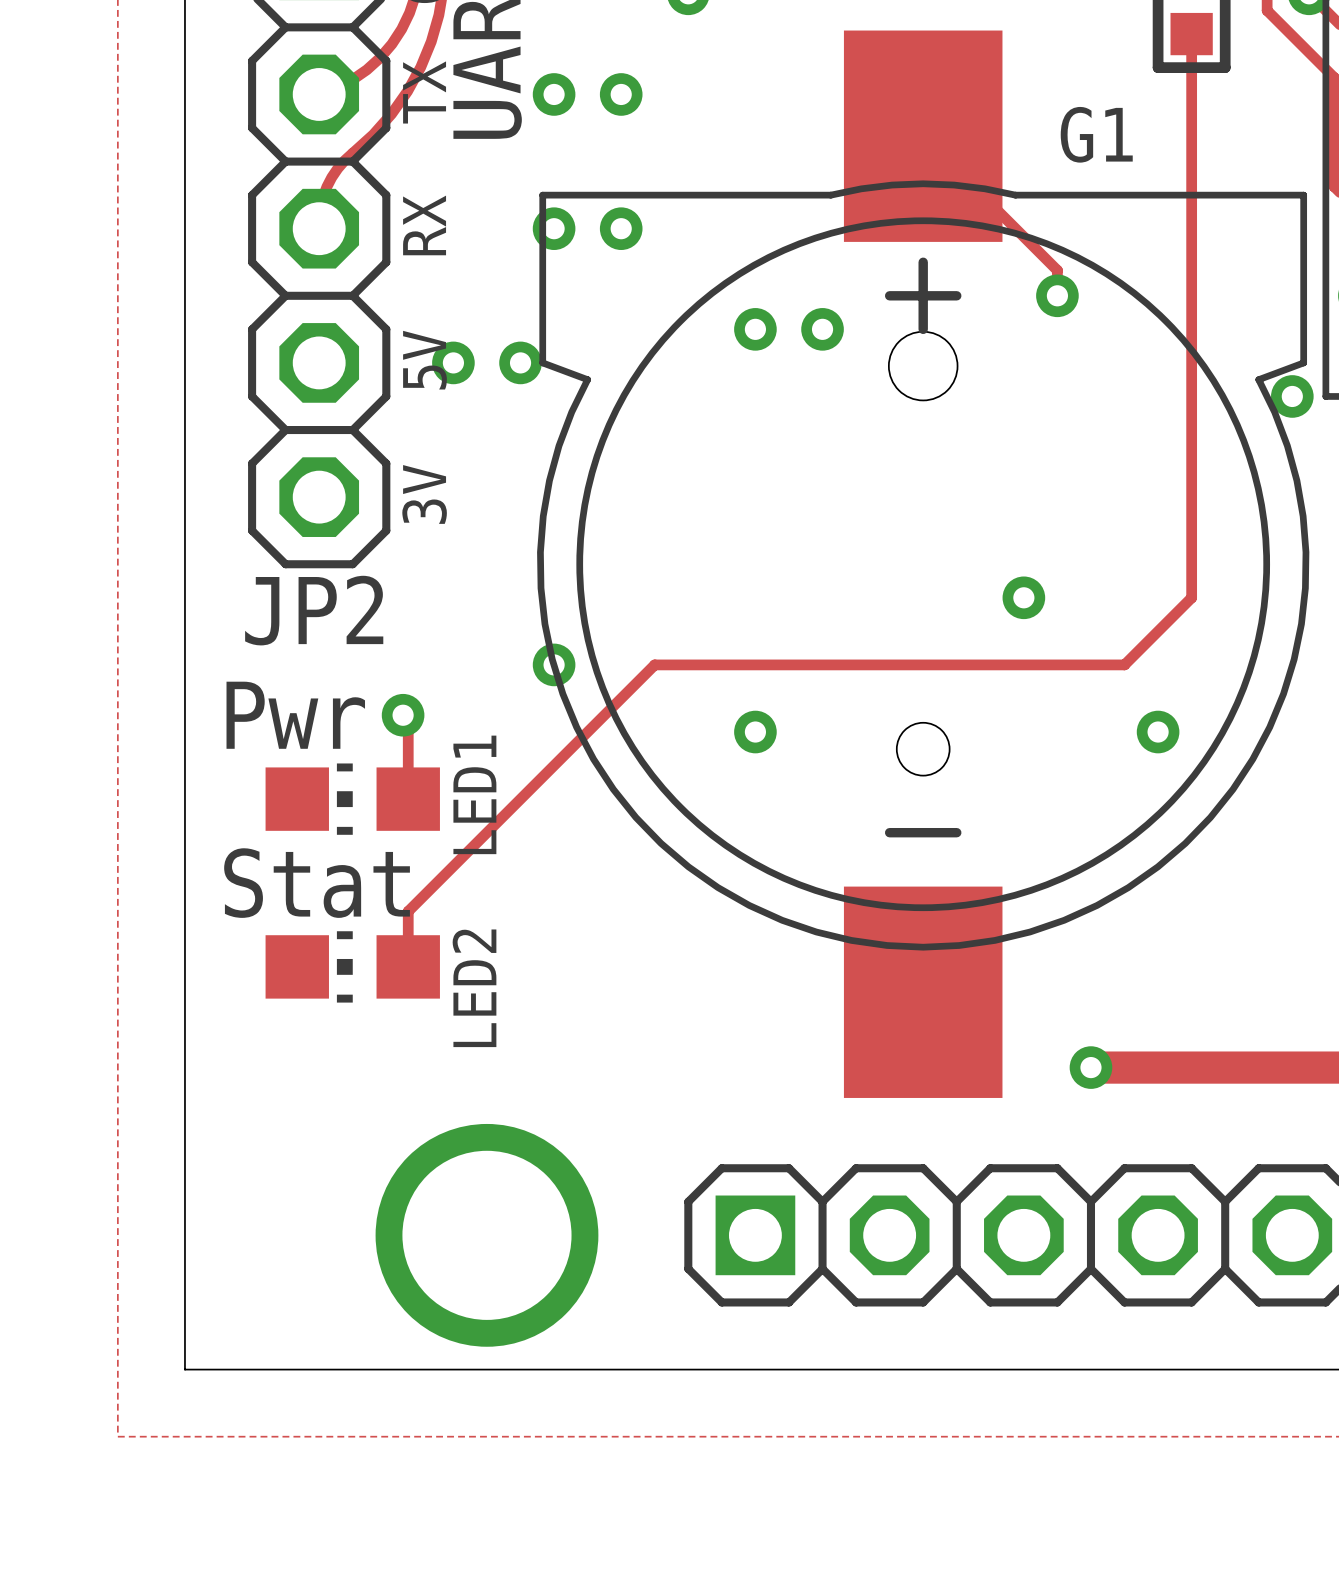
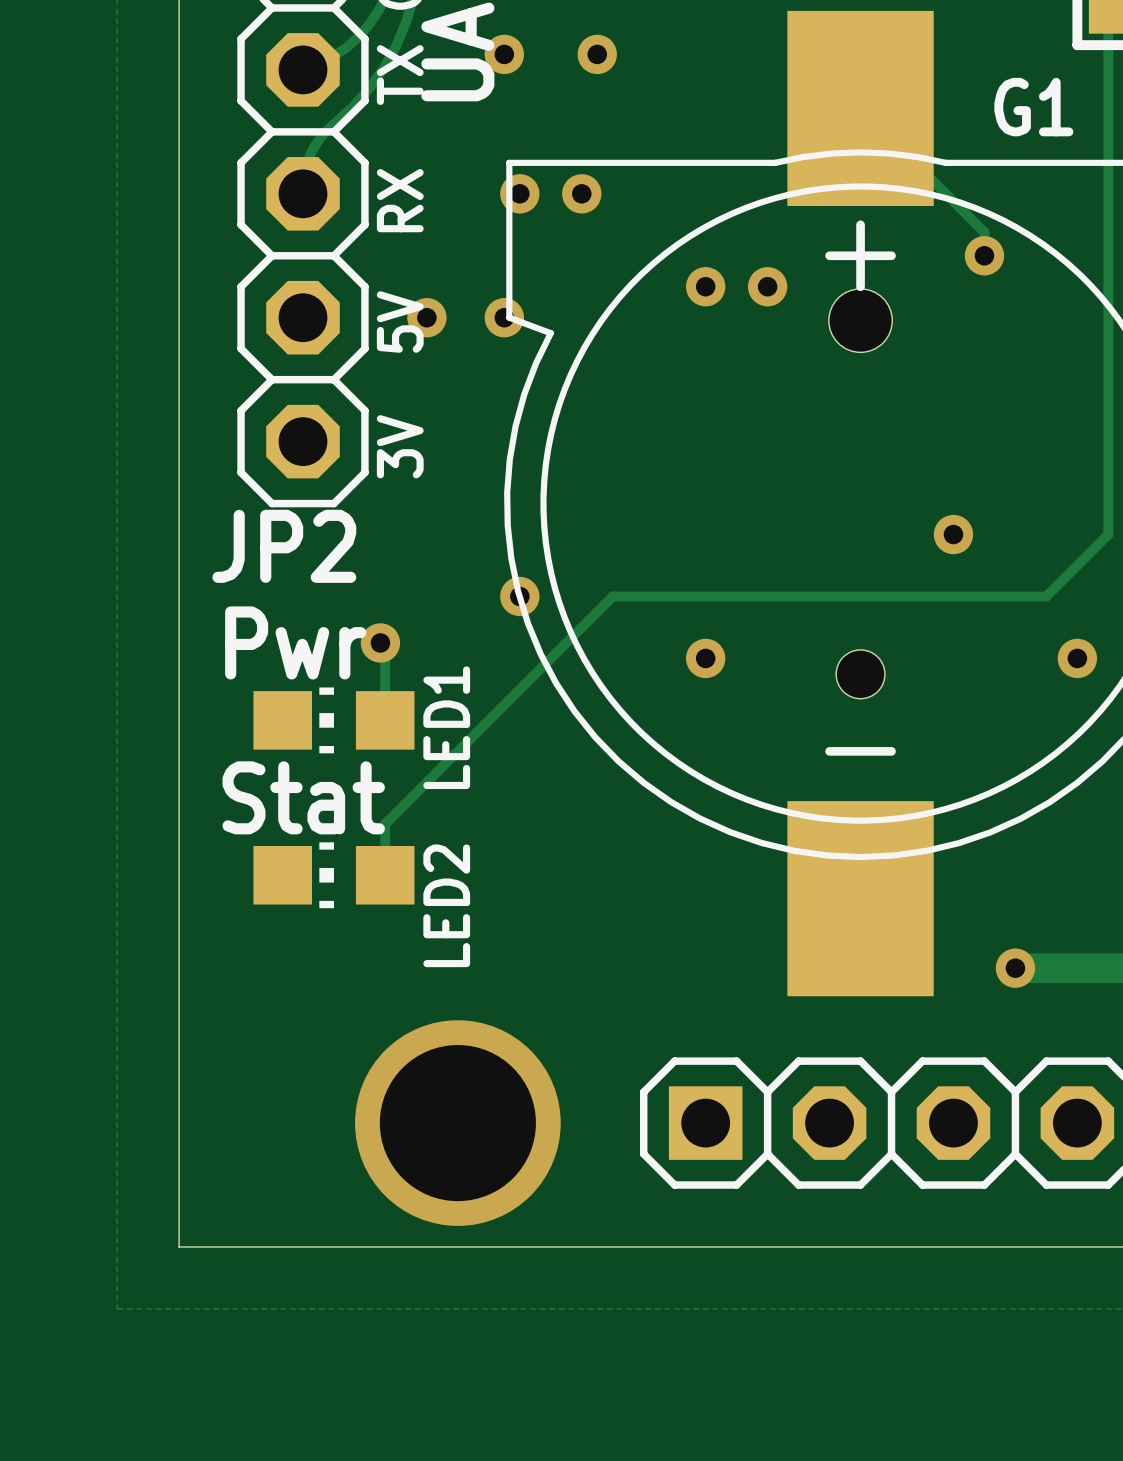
via position: (554, 94) -> (504, 54)
via position: (621, 94) -> (597, 54)
via position: (520, 362) -> (504, 317)

